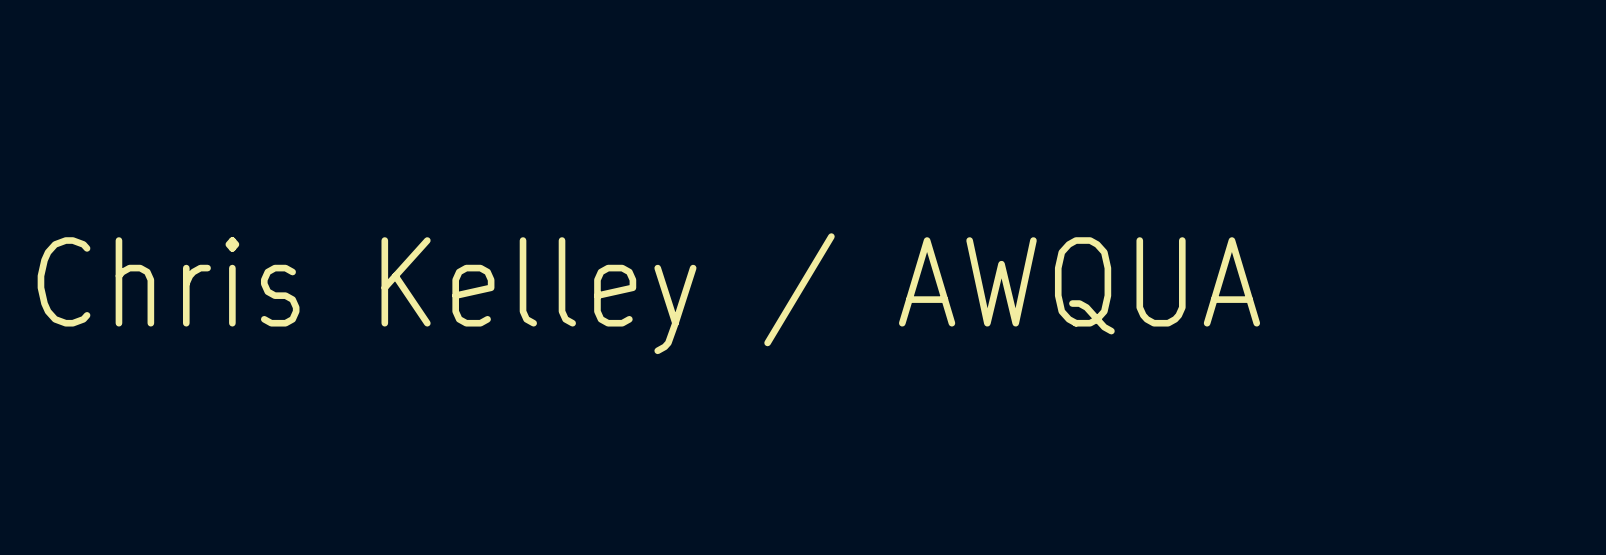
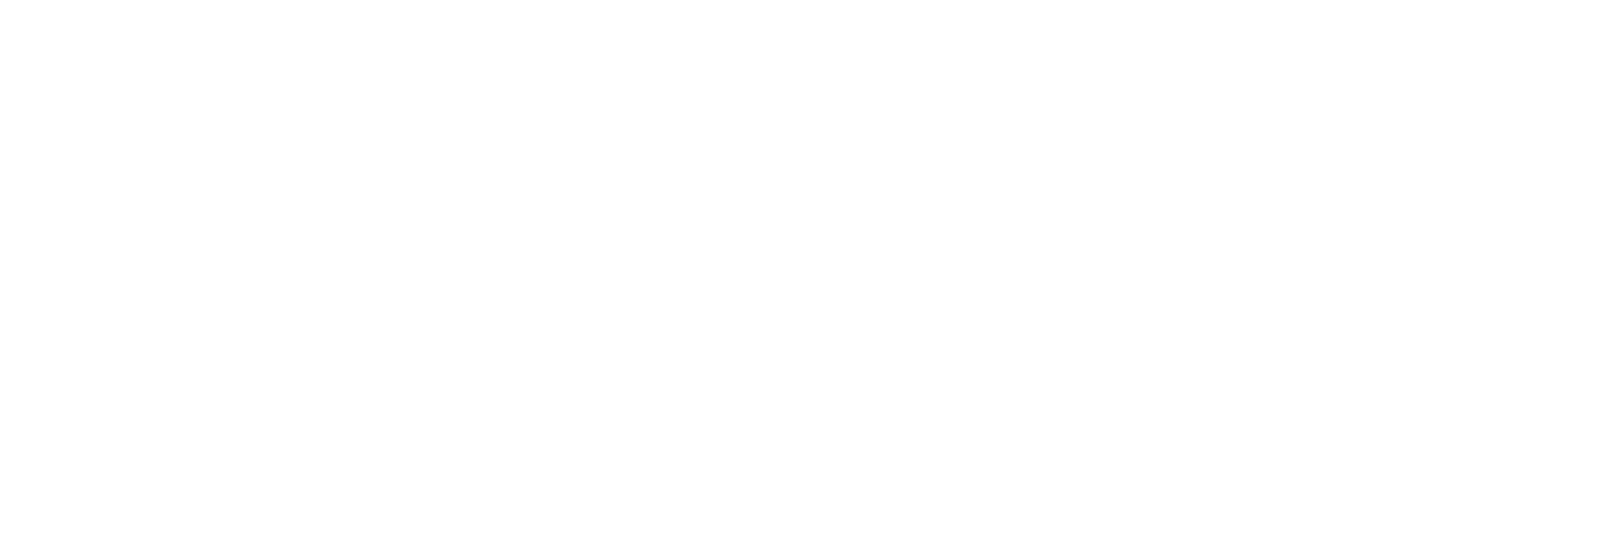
text: Chris Kelley / AWQUA (648, 293) -> none

